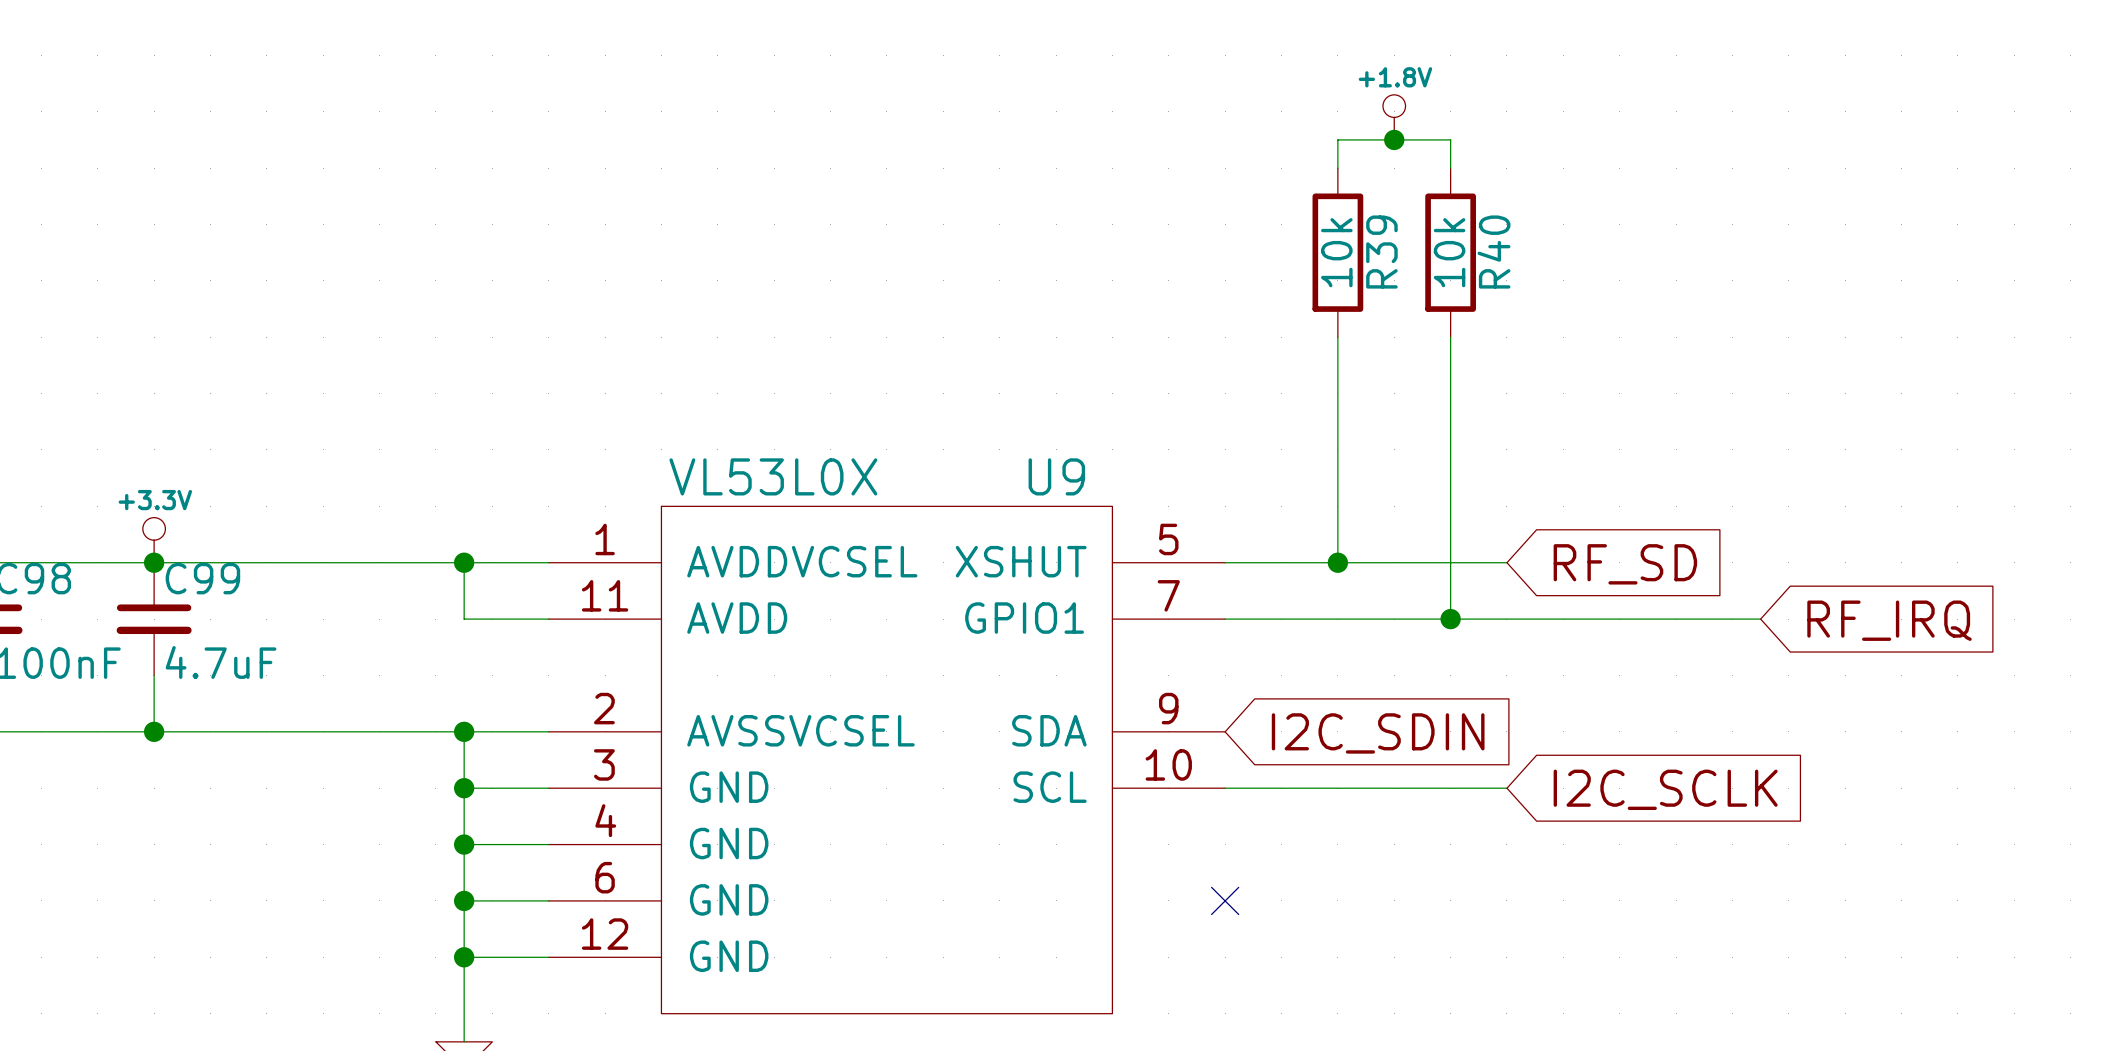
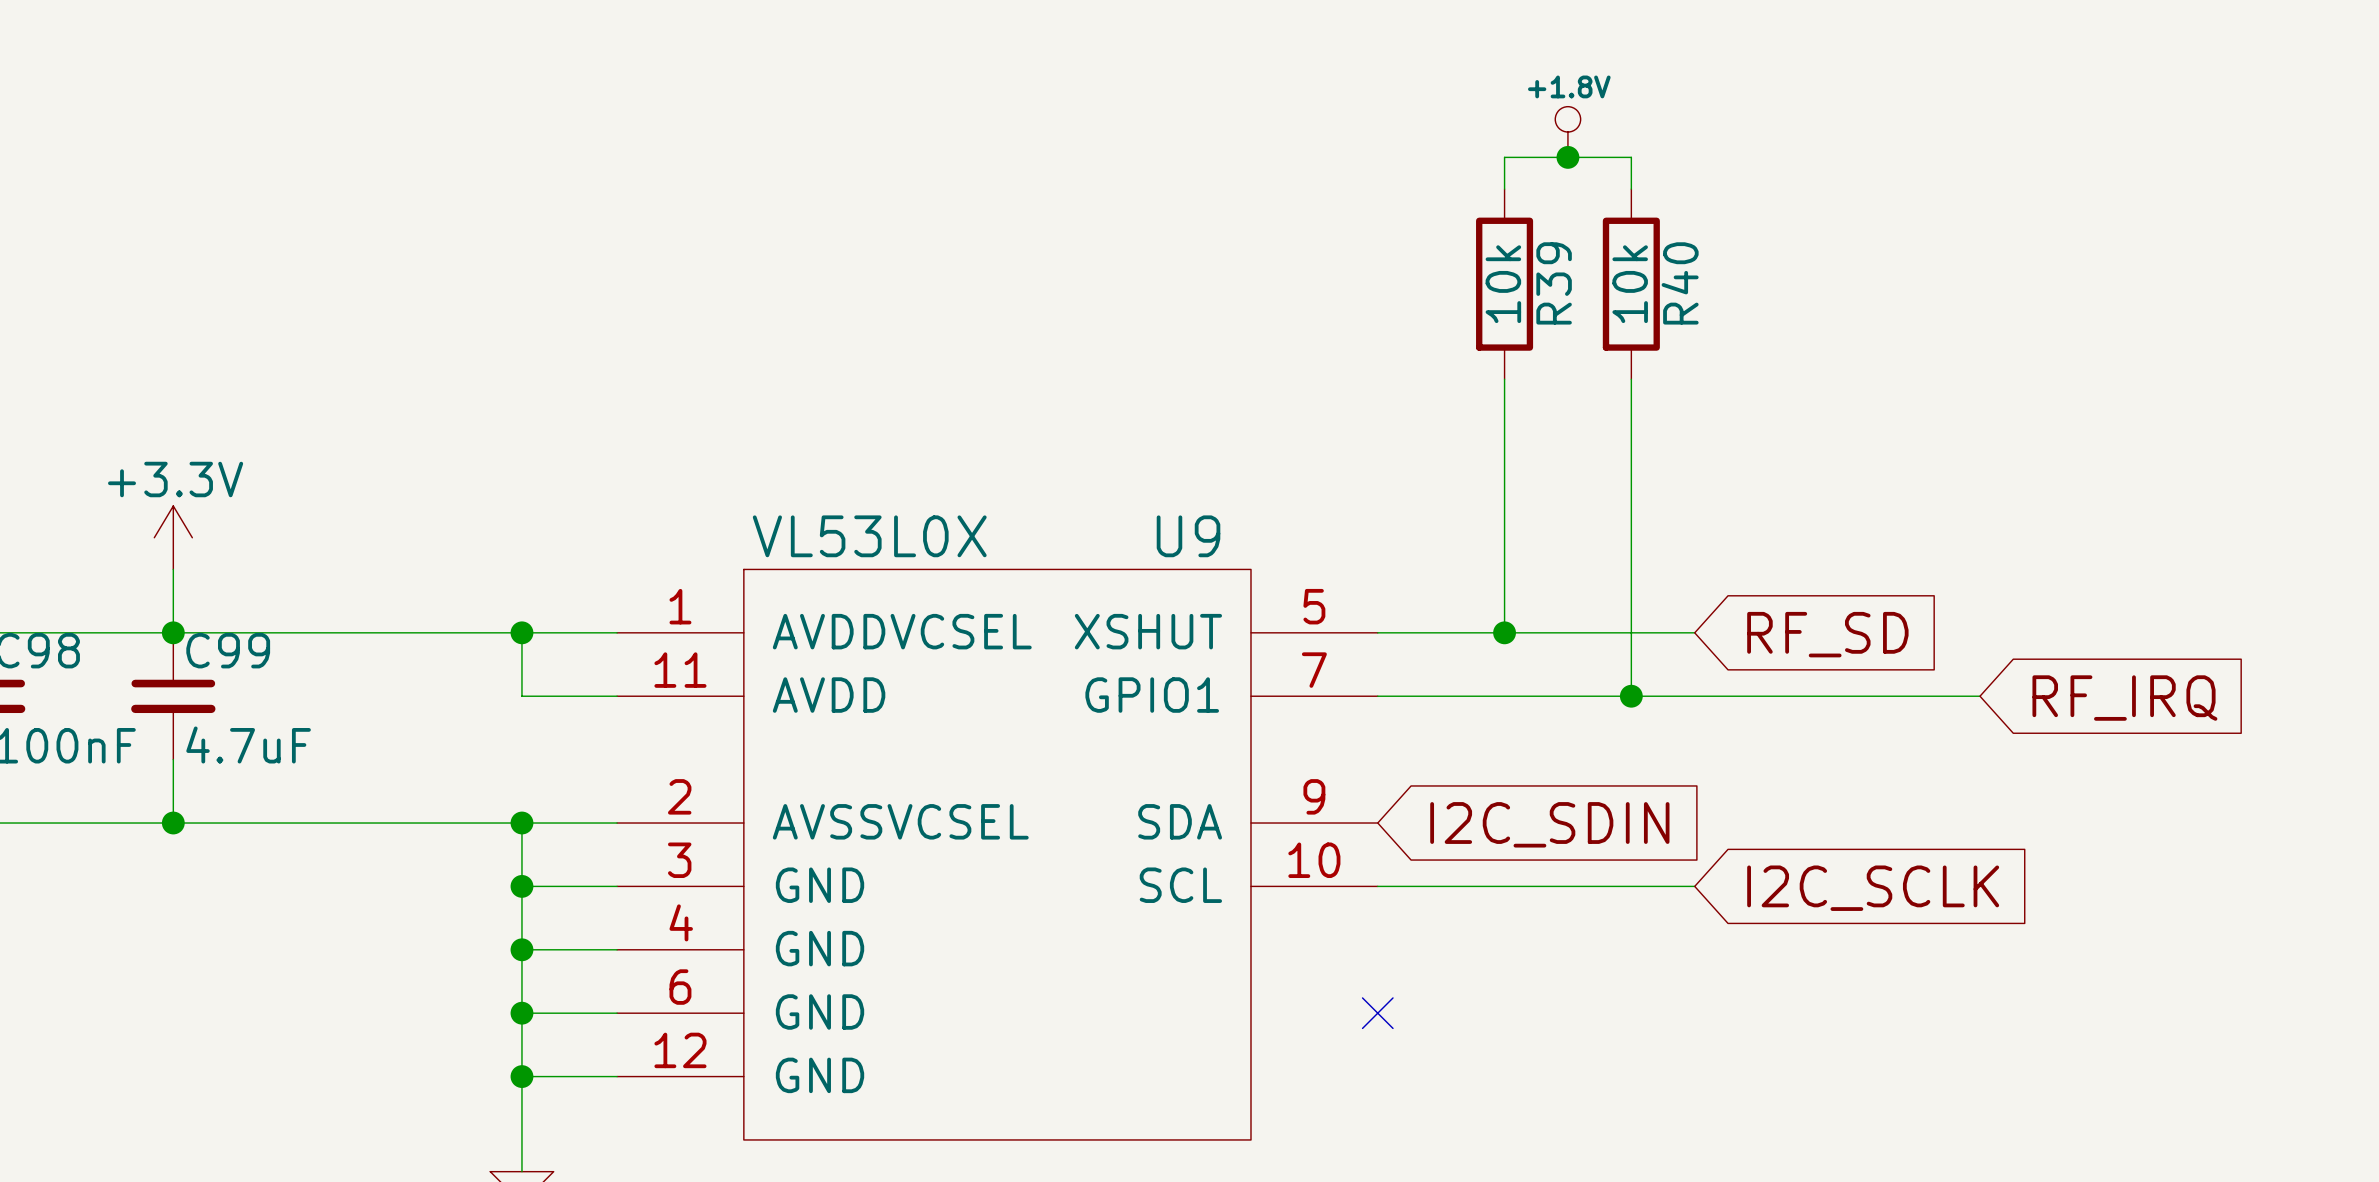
power symbol: none -> +3.3V (173, 537)
wire: none -> (173, 569) (173, 632)
power symbol: +3.3V (154, 540) -> none

